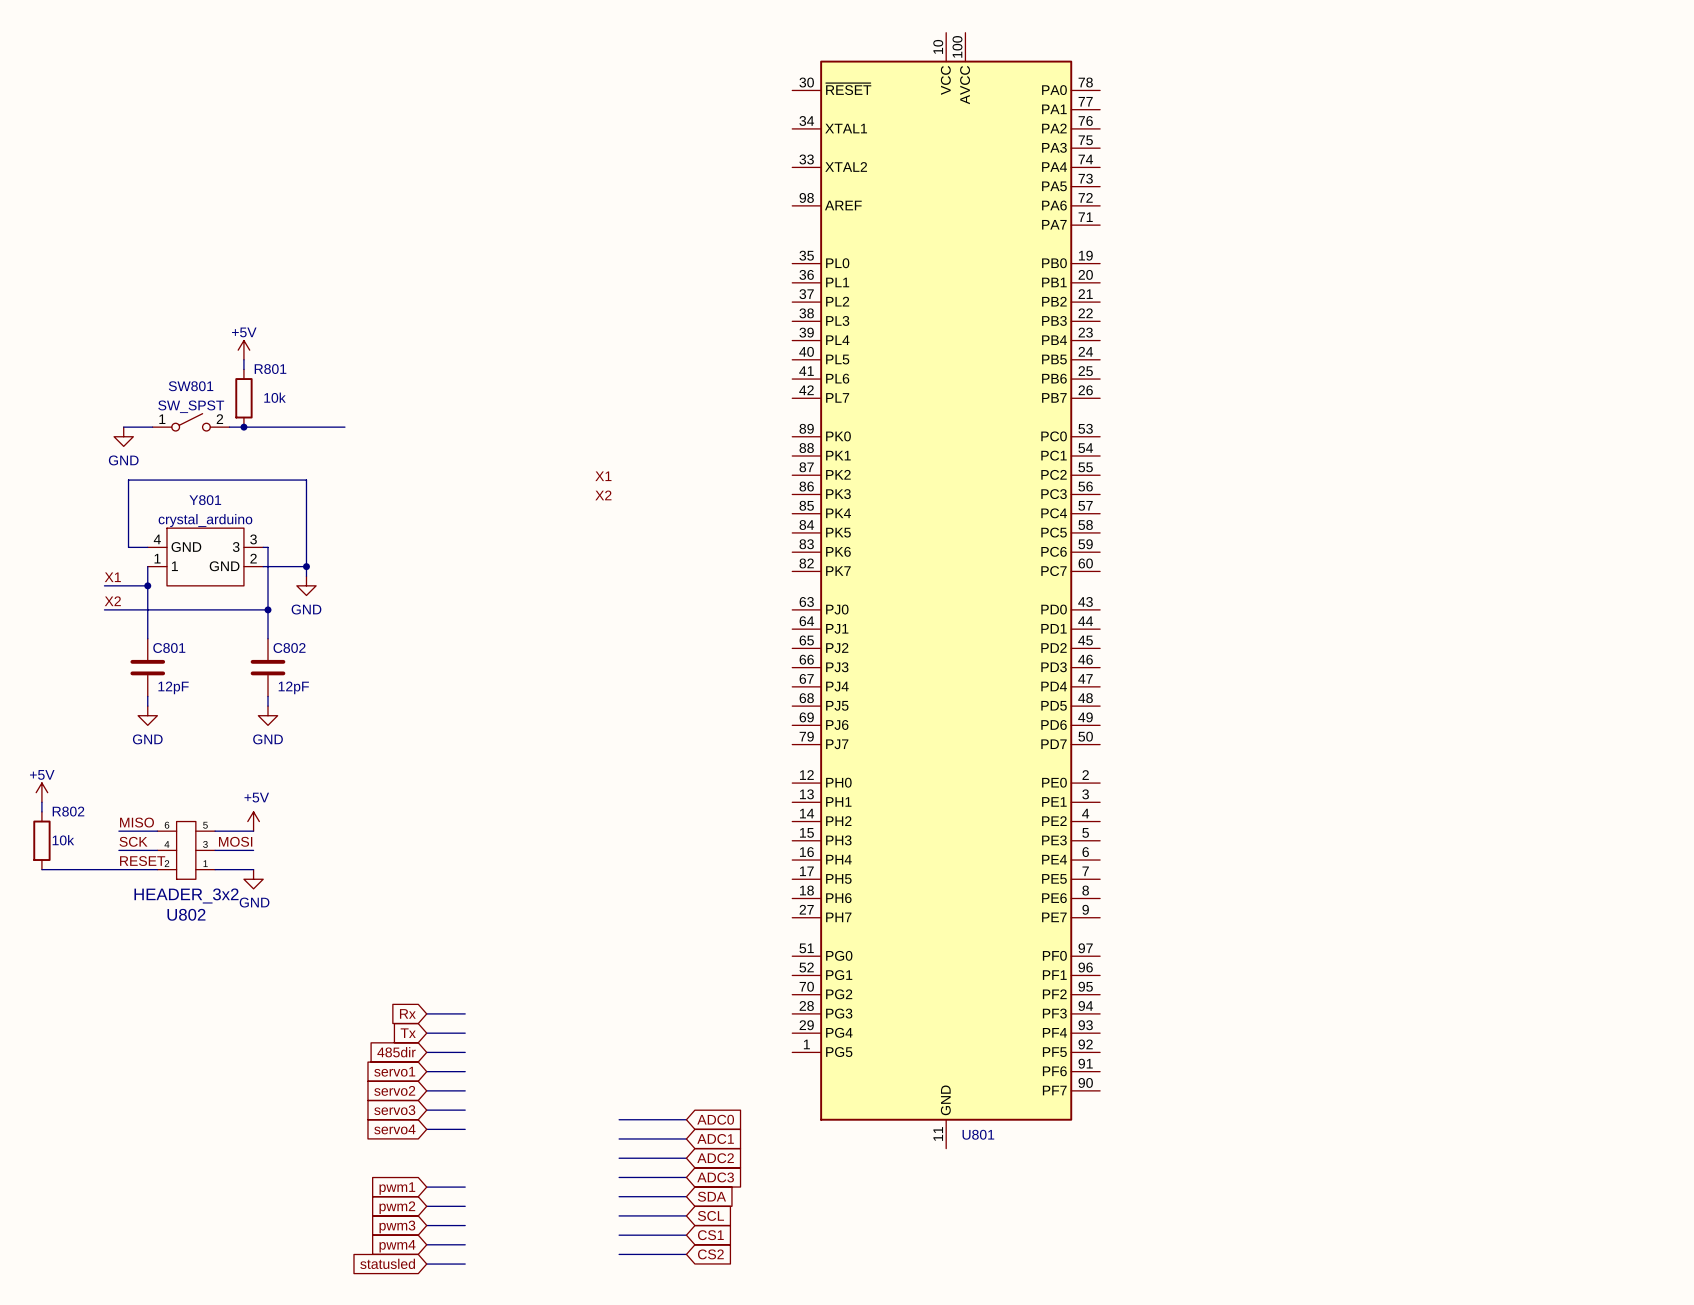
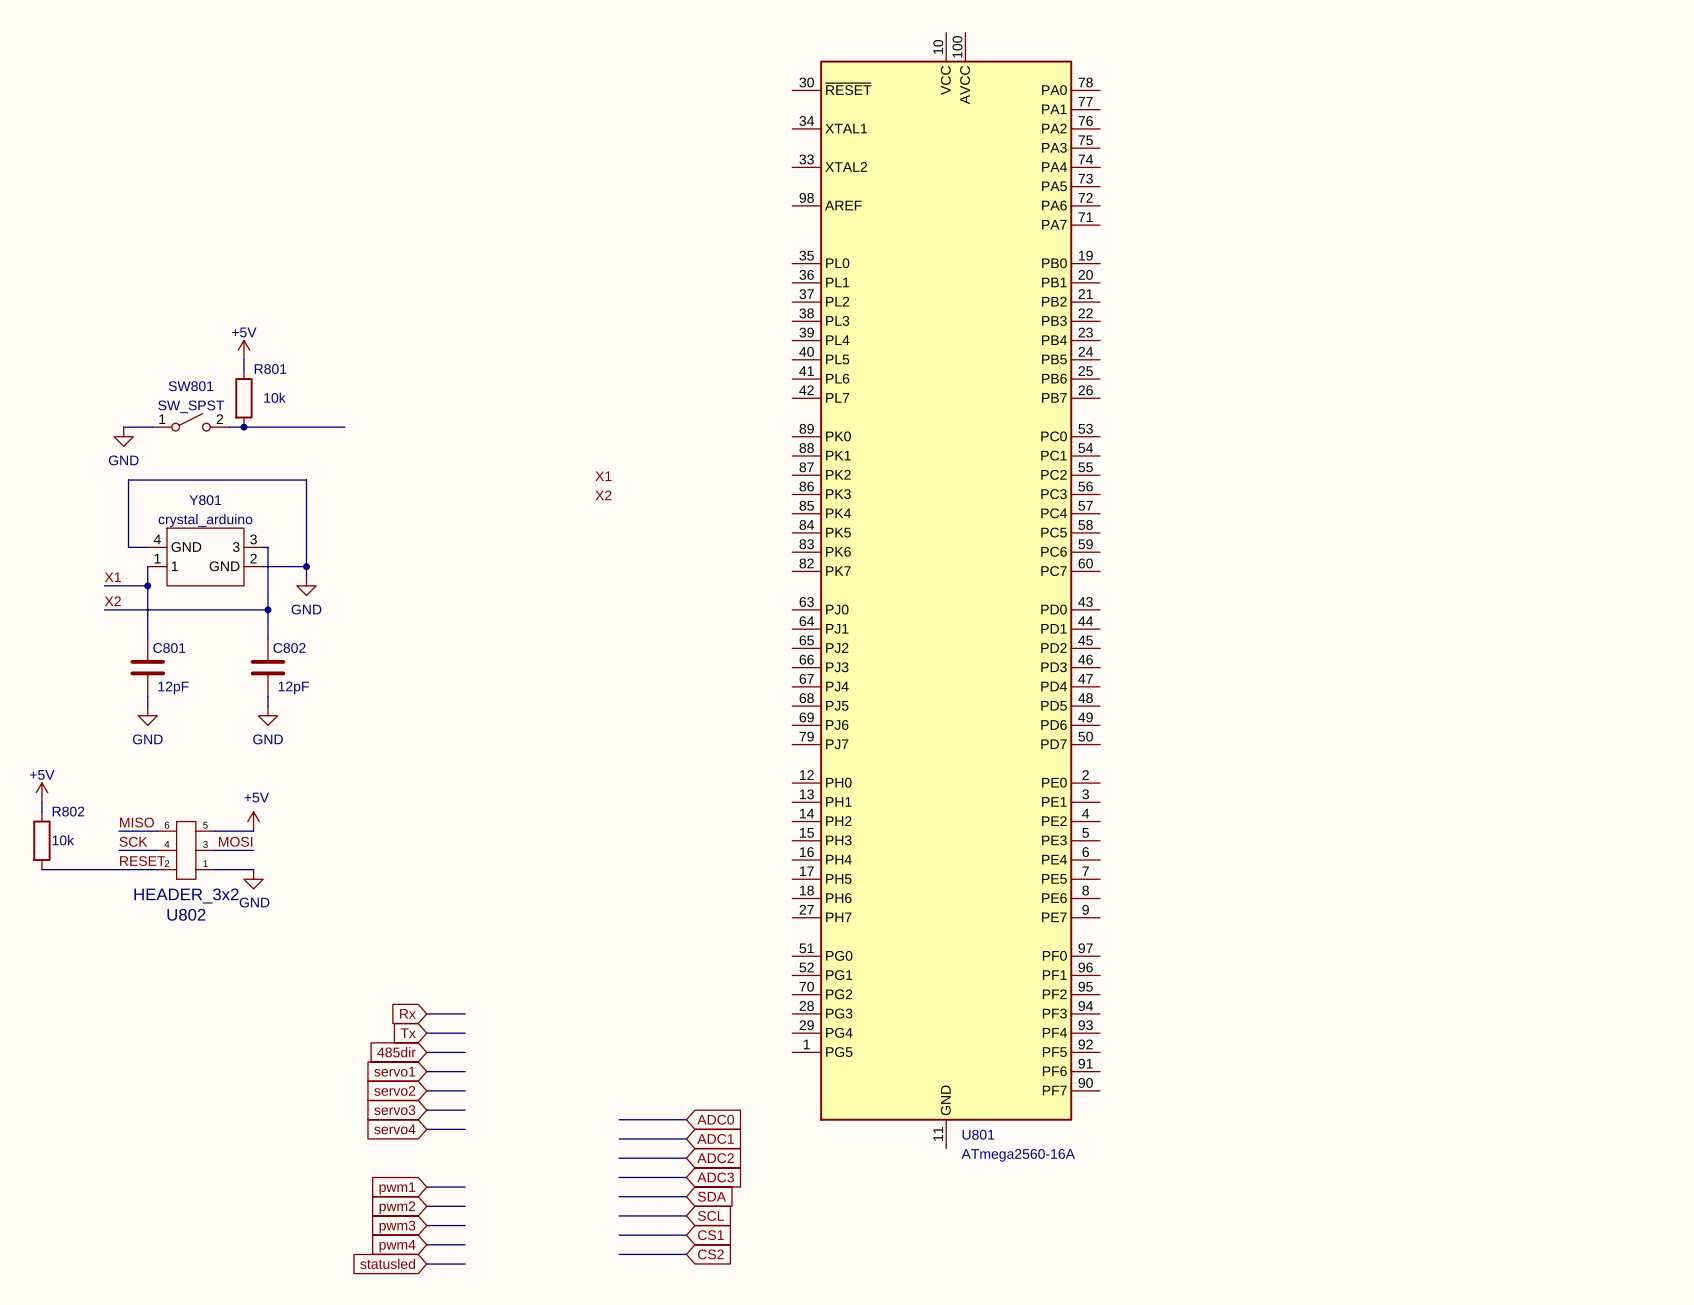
U801 value: none -> ATmega2560-16A (1018, 1155)

